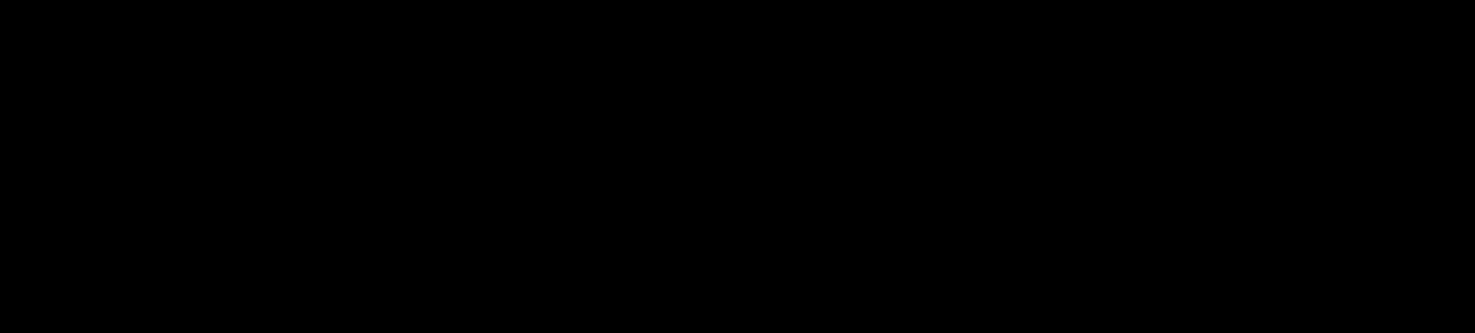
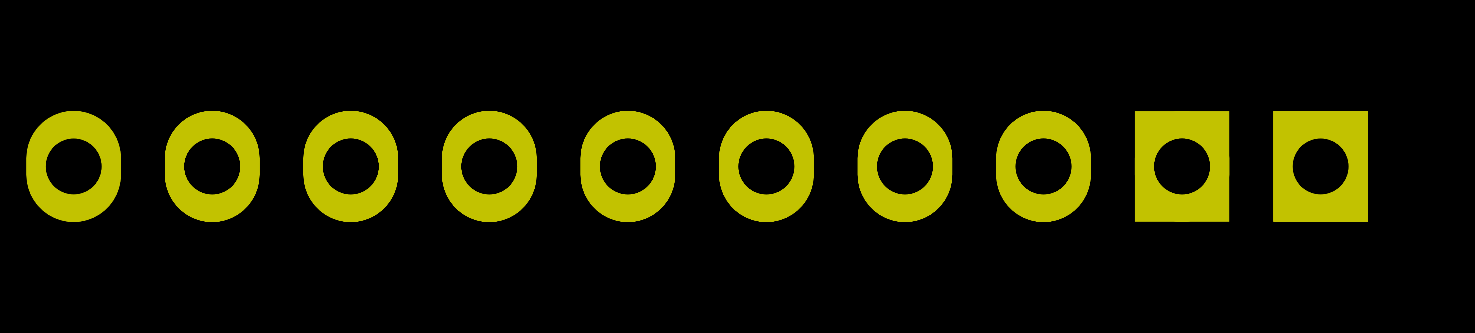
part: none -> (697, 166)
part: none -> (697, 166)

